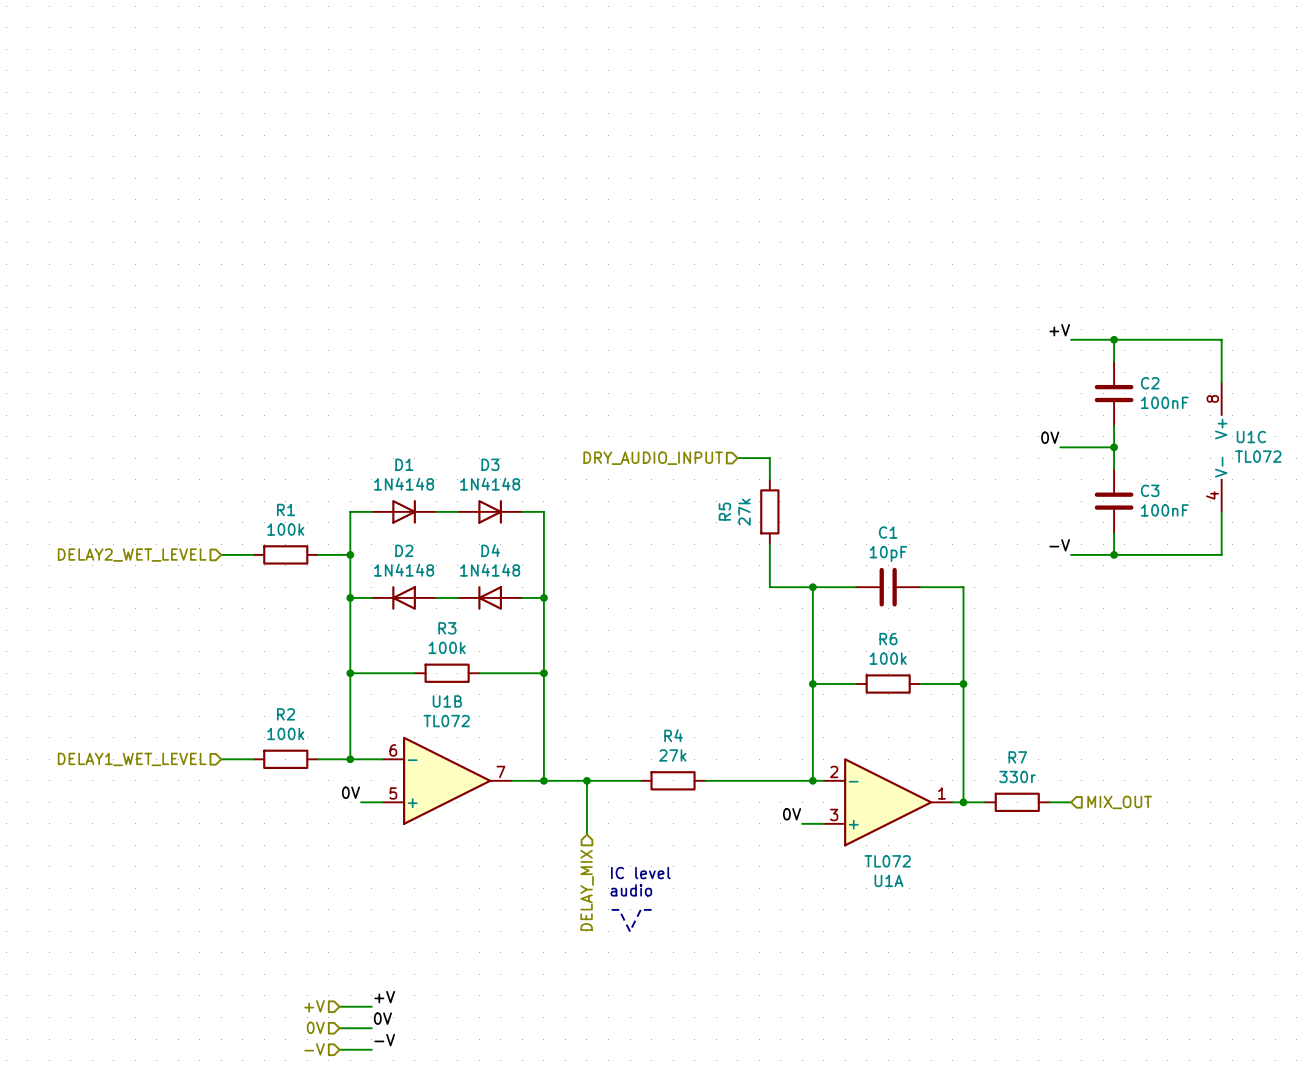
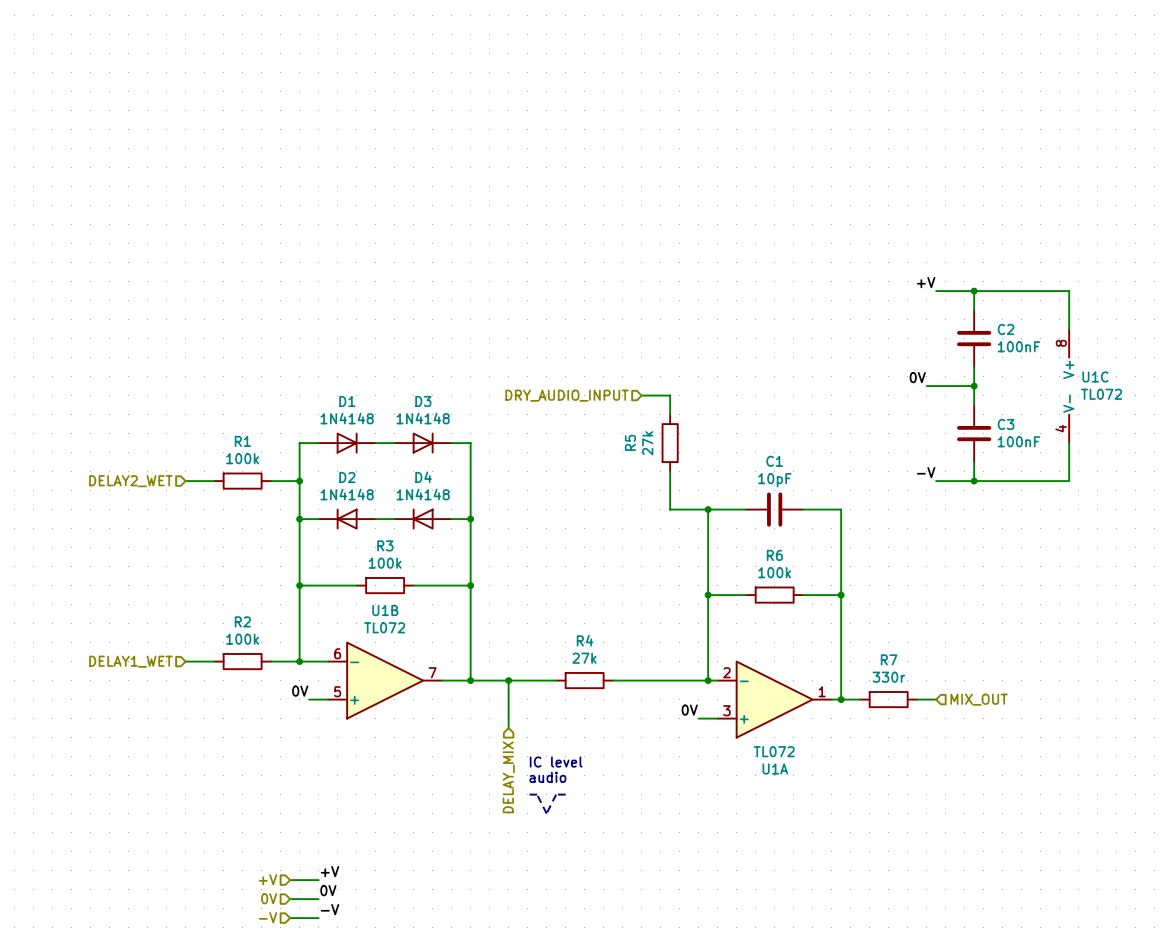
hierarchical label: DELAY2_WET_LEVEL (132, 555) -> DELAY2_WET (130, 481)
hierarchical label: DELAY1_WET_LEVEL (132, 759) -> DELAY1_WET (130, 661)

